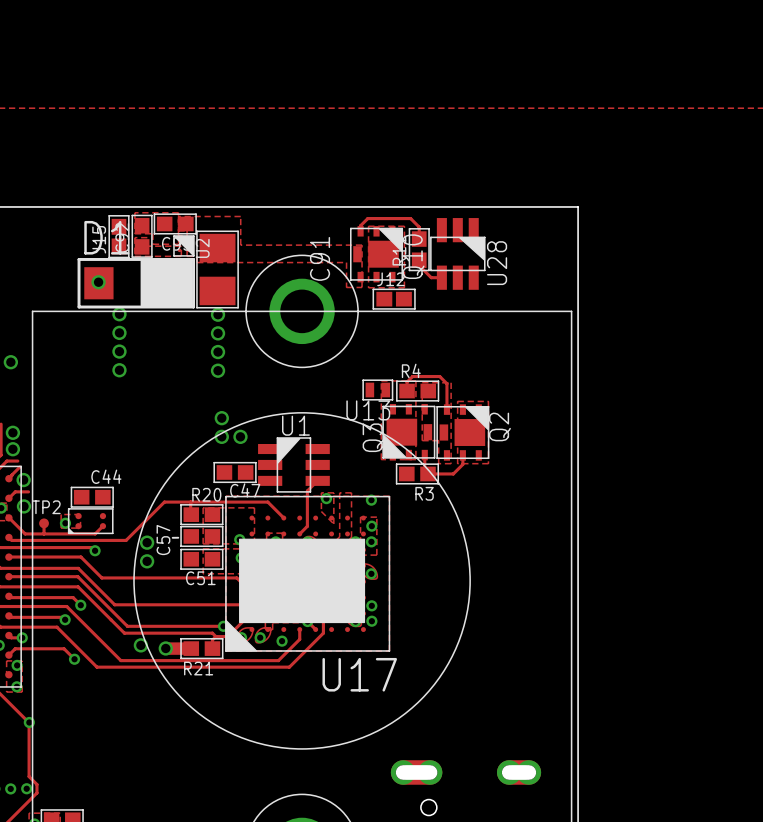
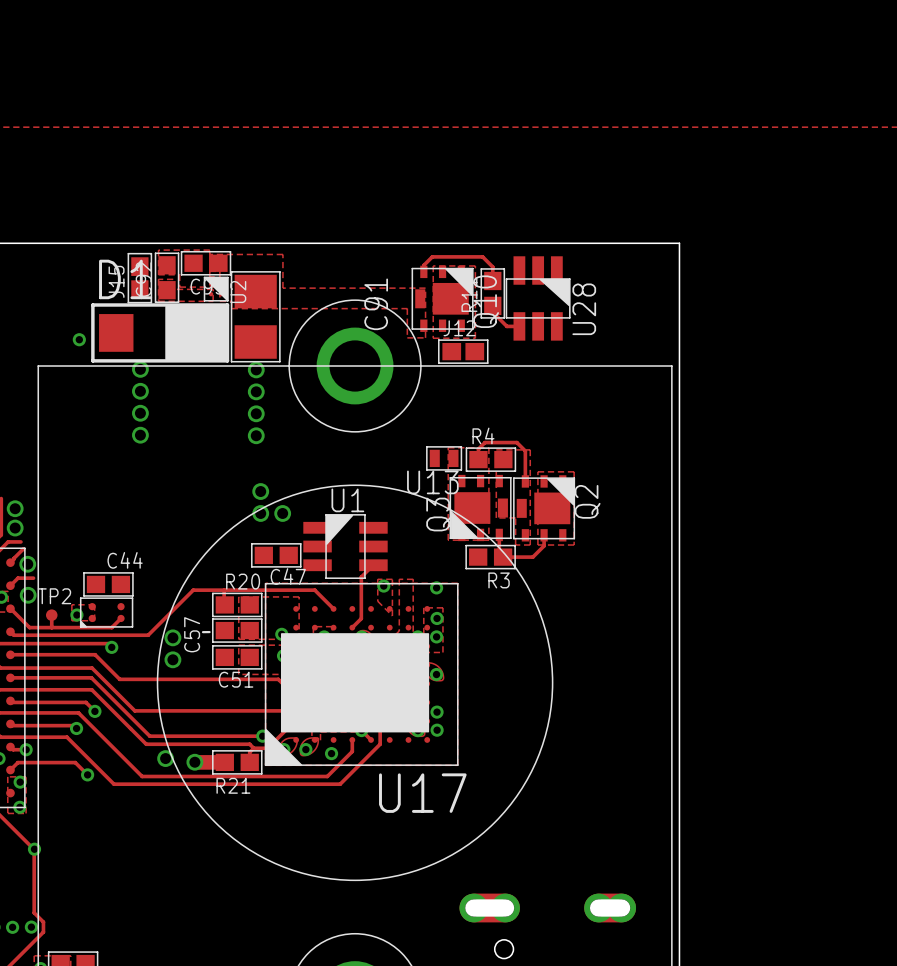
via: (98, 282) -> none
via: none -> (79, 339)
via: (10, 362) -> none

